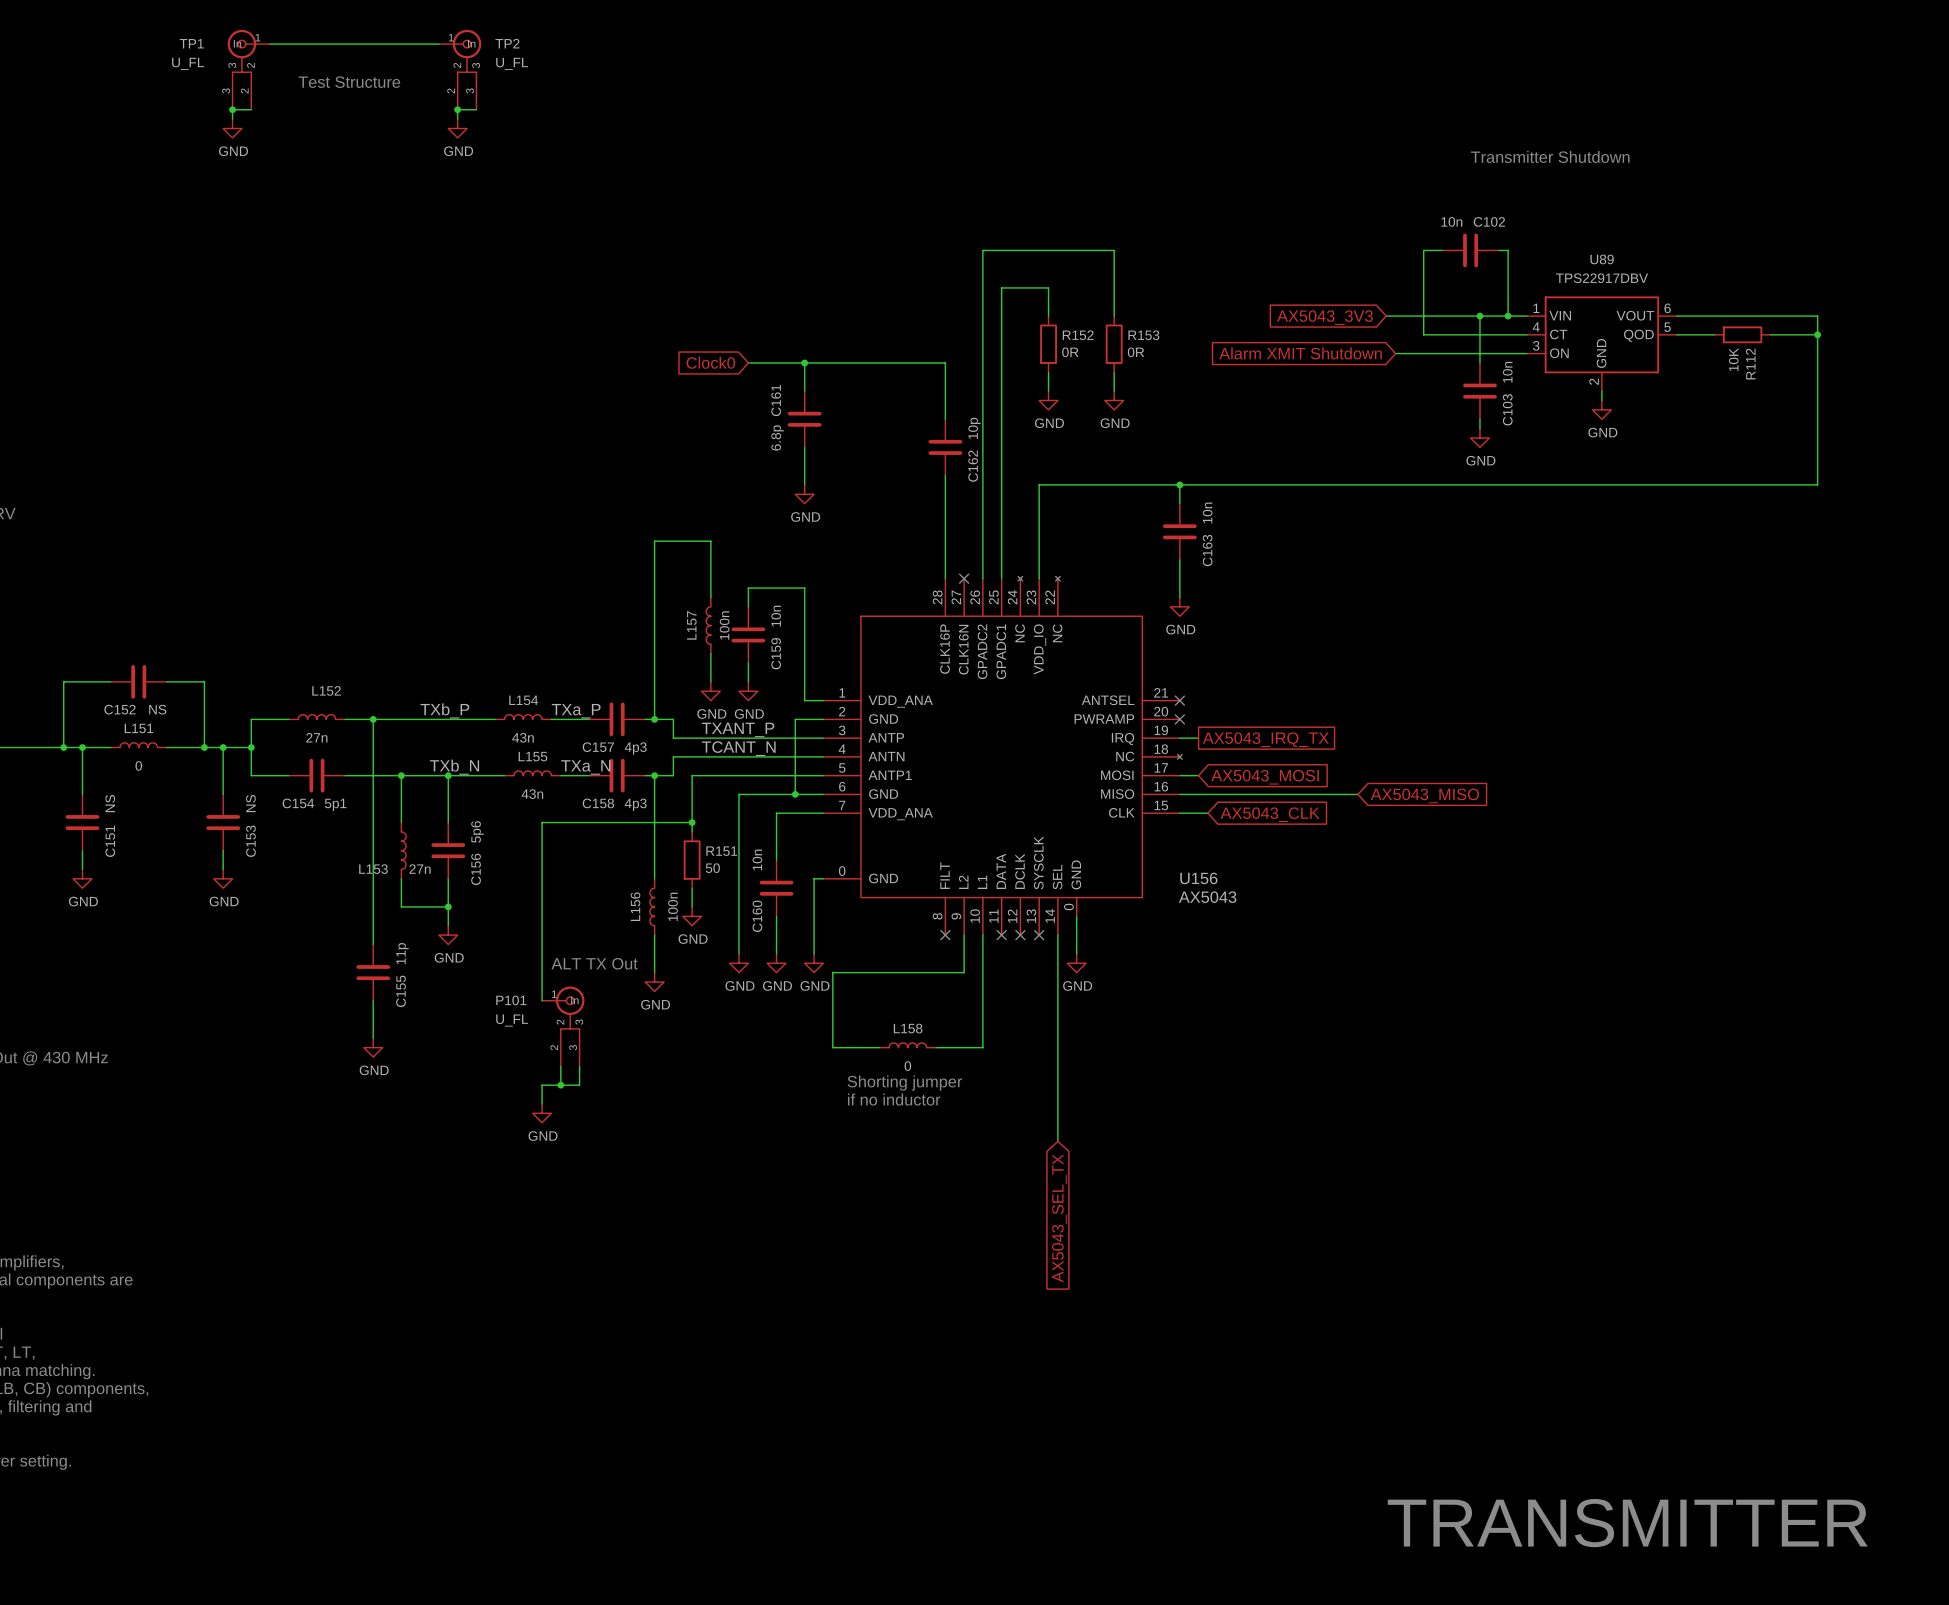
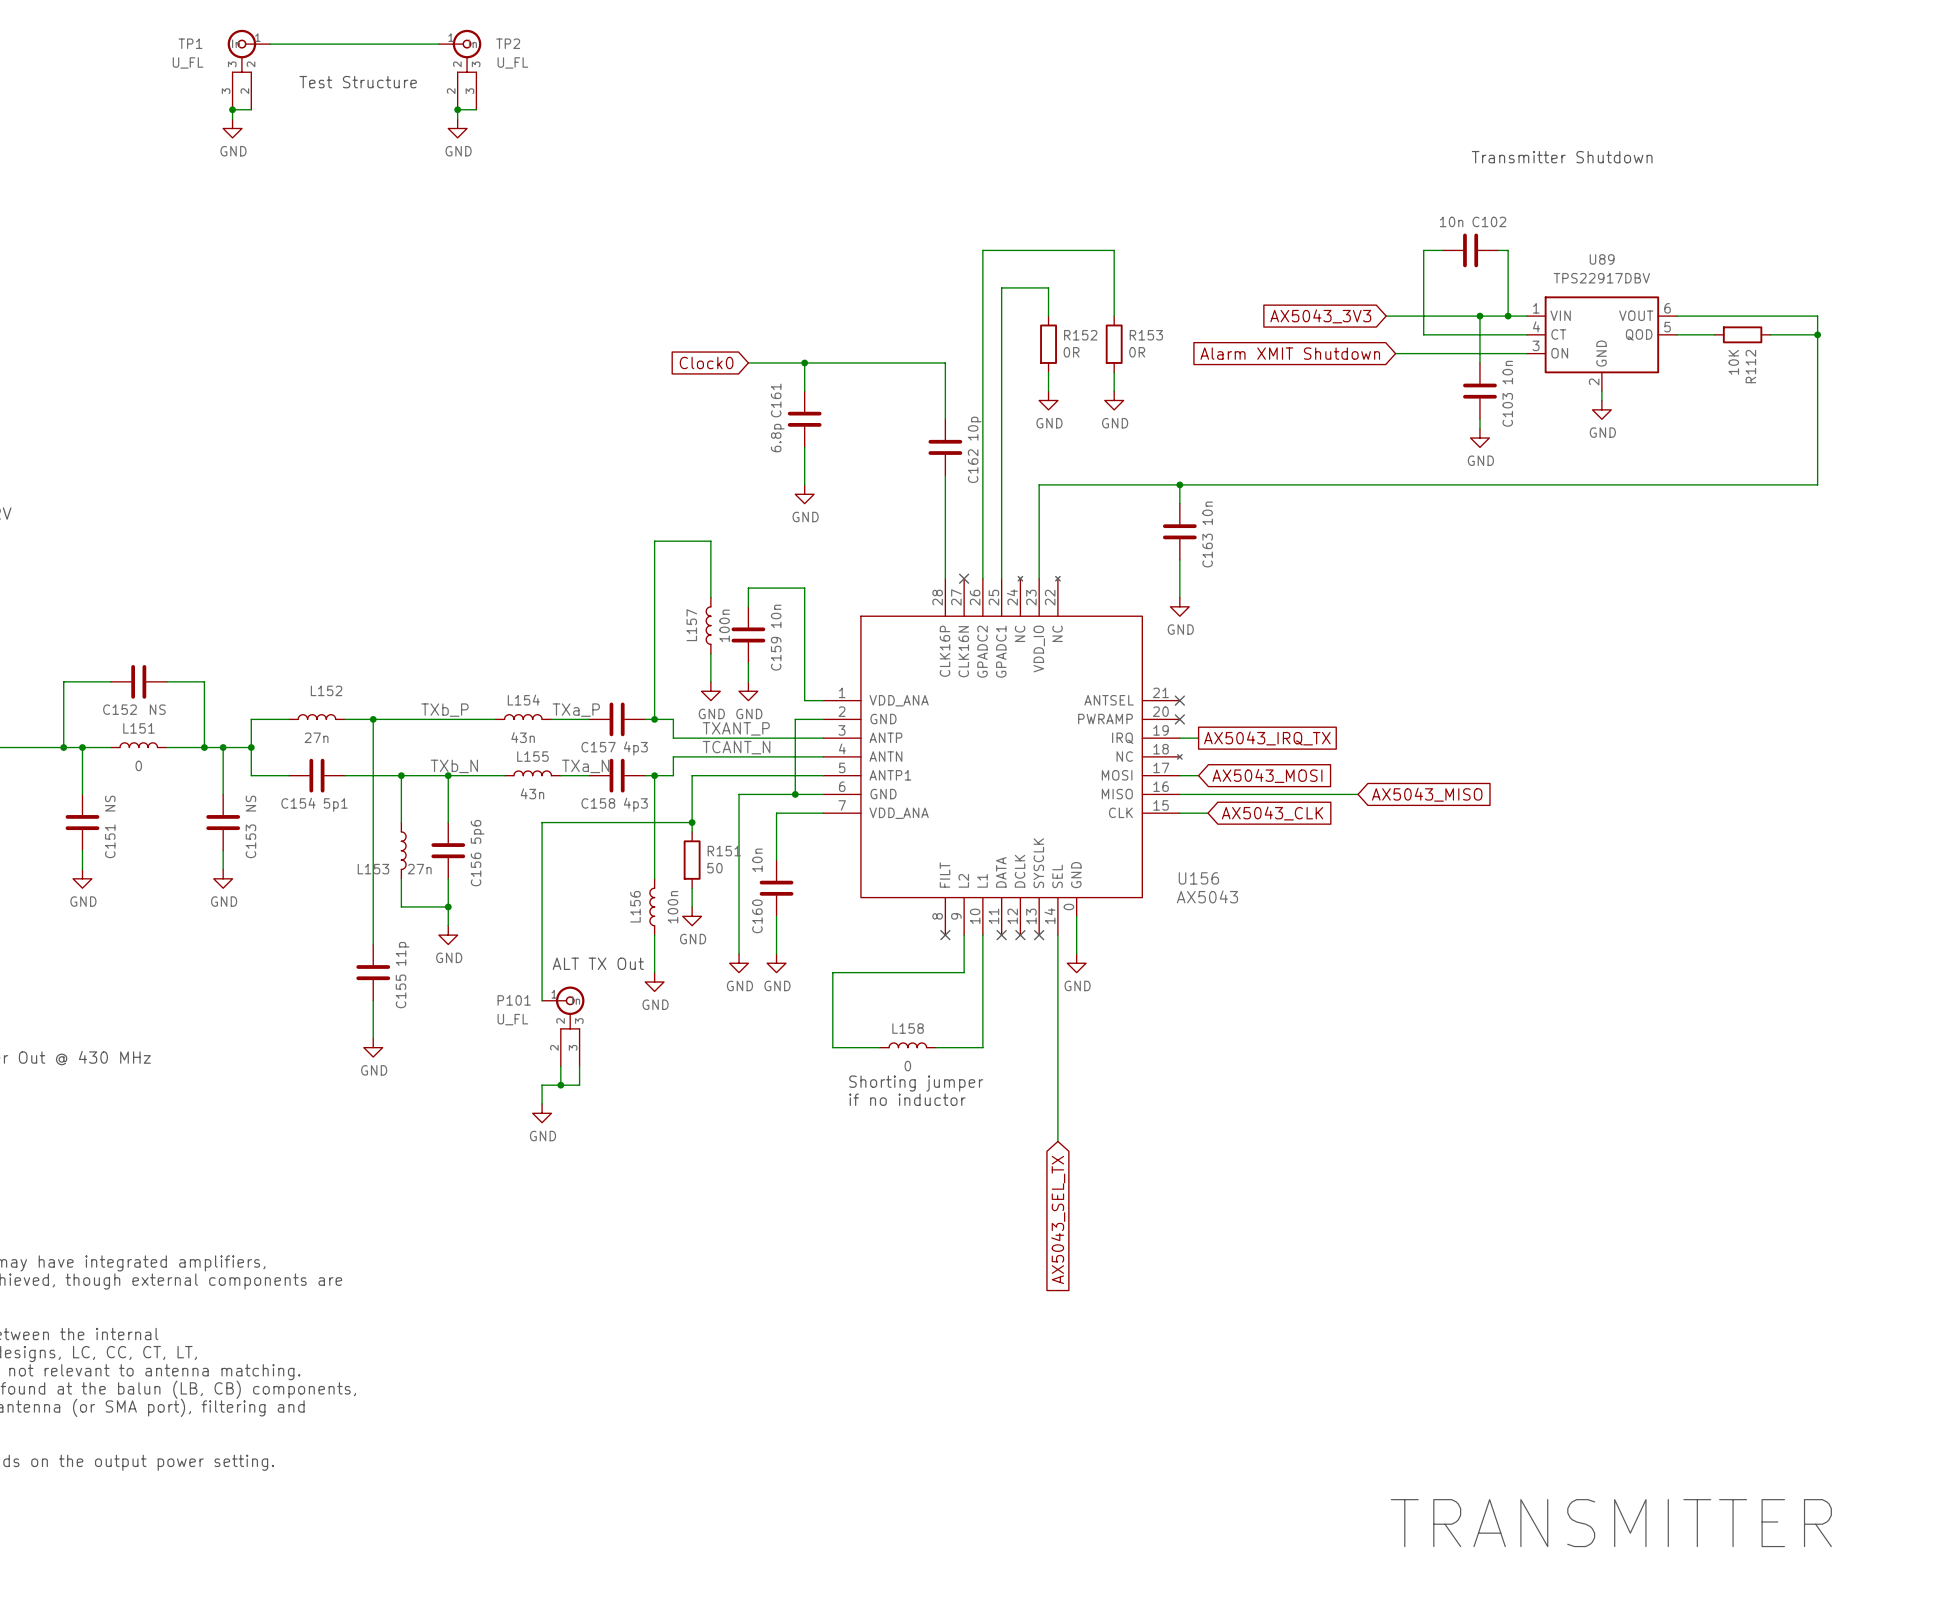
U156 symbol: [823, 576, 1183, 936] -> [823, 576, 1183, 936]
wire: (823, 878) (814, 878) (814, 953) -> none
power symbol: GND (814, 963) -> none

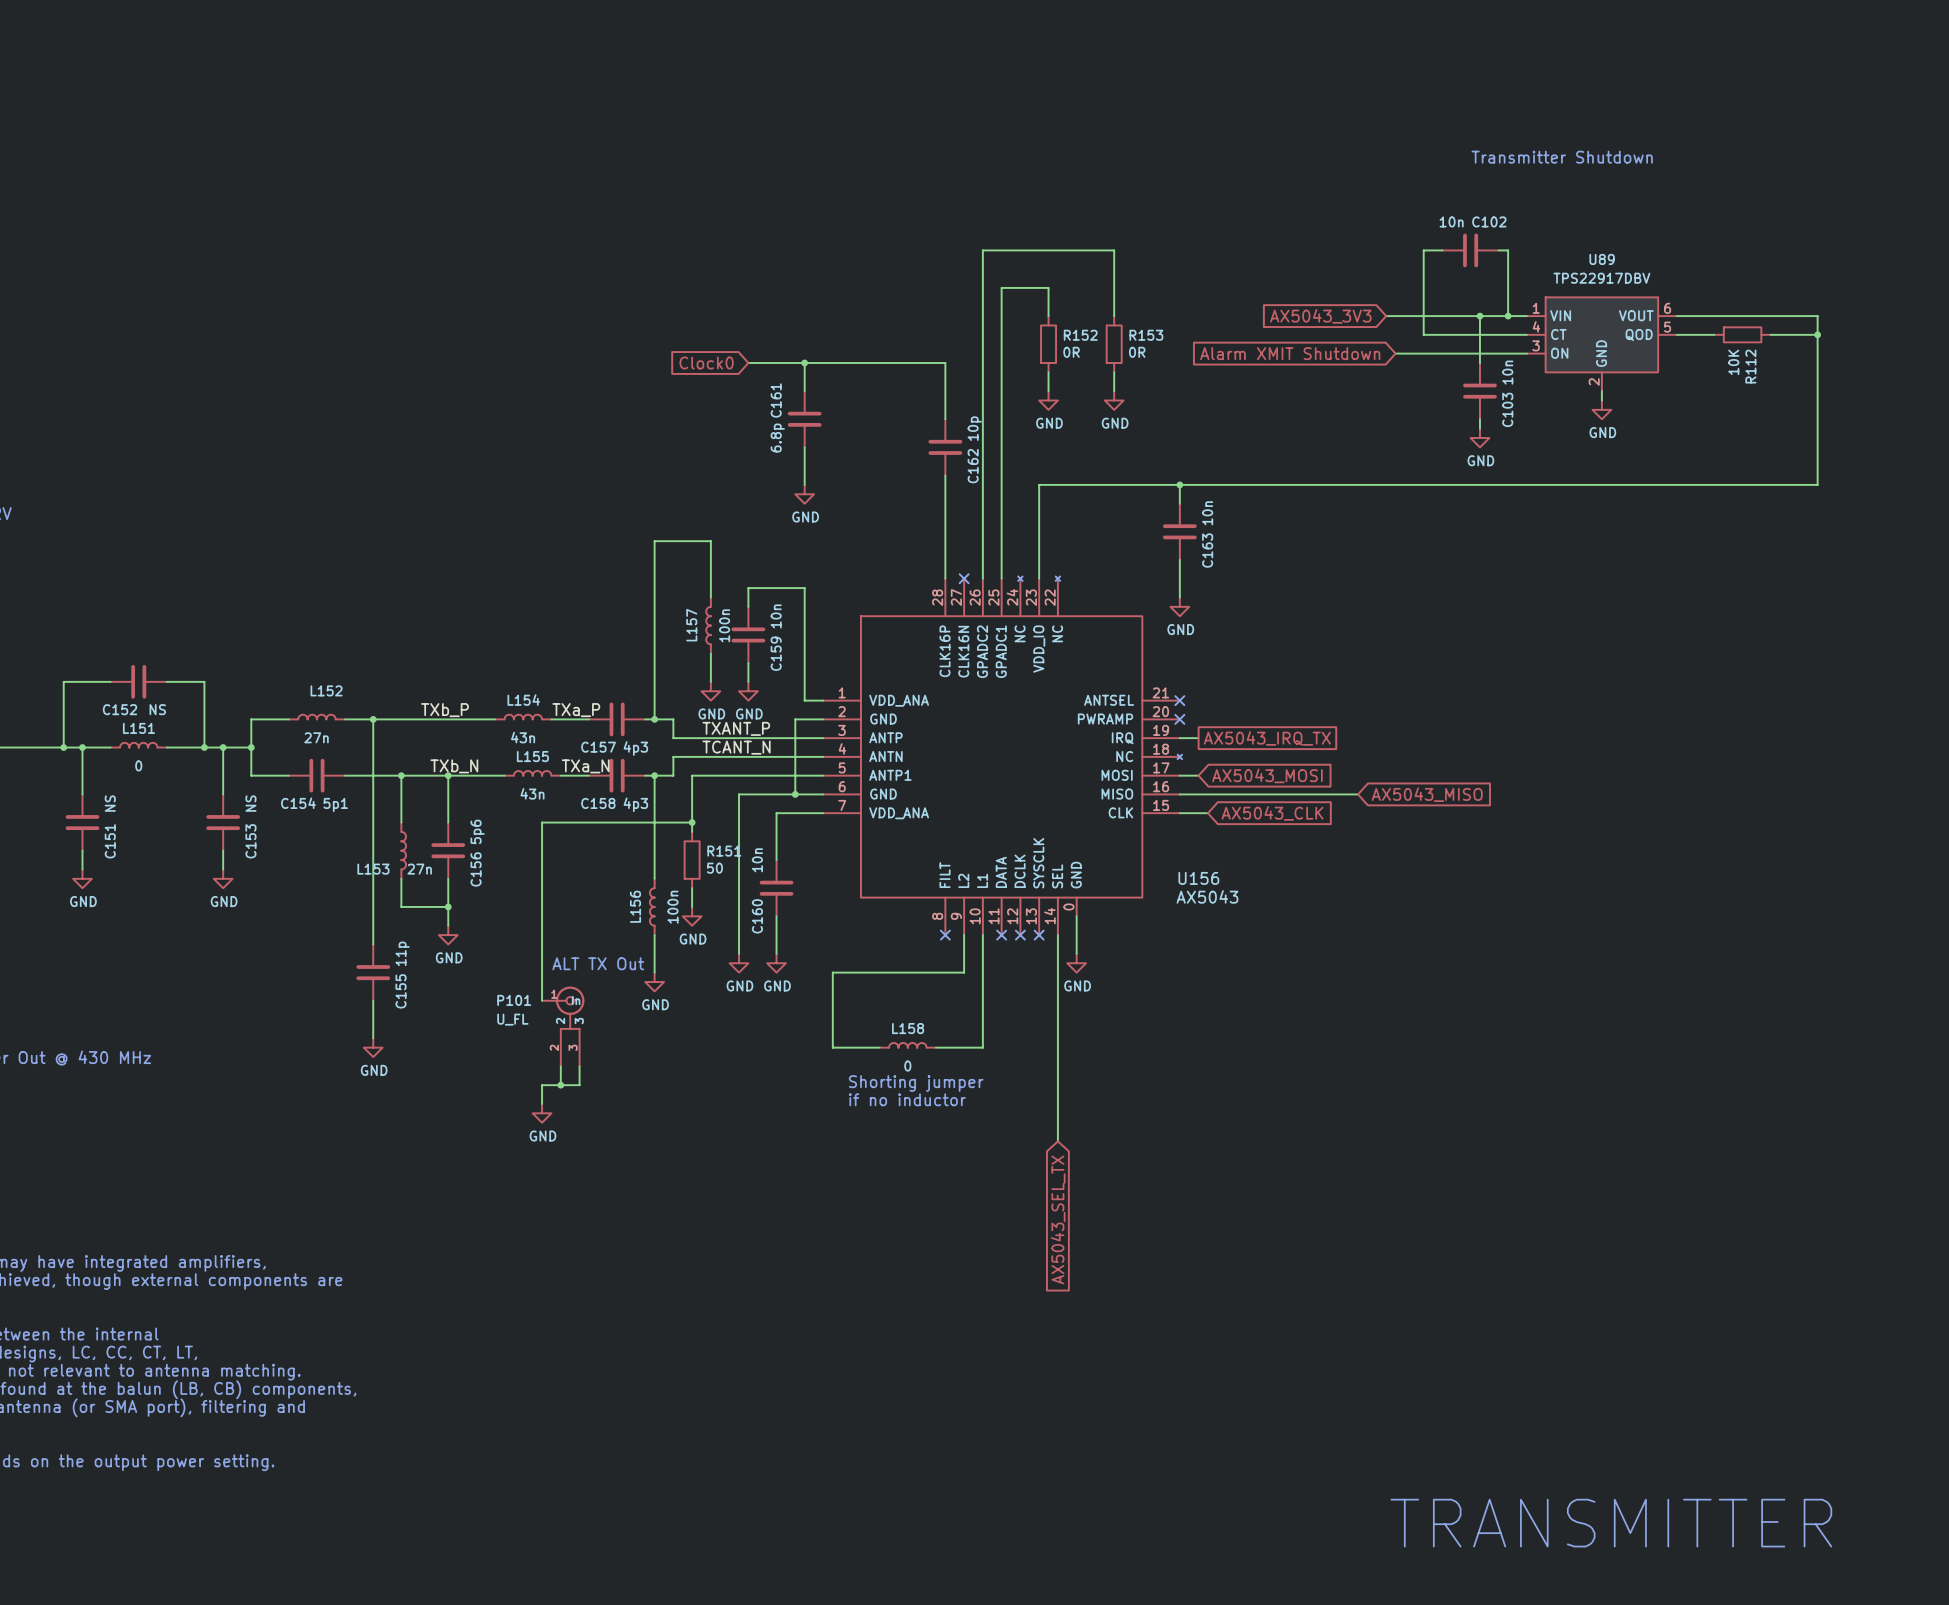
wire: (270, 44) (438, 44) -> none
TP1: U_FL (248, 69) -> none
TP2: U_FL (460, 69) -> none
text: Test Structure (358, 82) -> none
junction: (232, 109) -> none
wire: (251, 109) (232, 109) (232, 119) -> none
junction: (457, 109) -> none
wire: (476, 109) (457, 109) (457, 119) -> none
power symbol: GND (232, 128) -> none
power symbol: GND (457, 128) -> none

